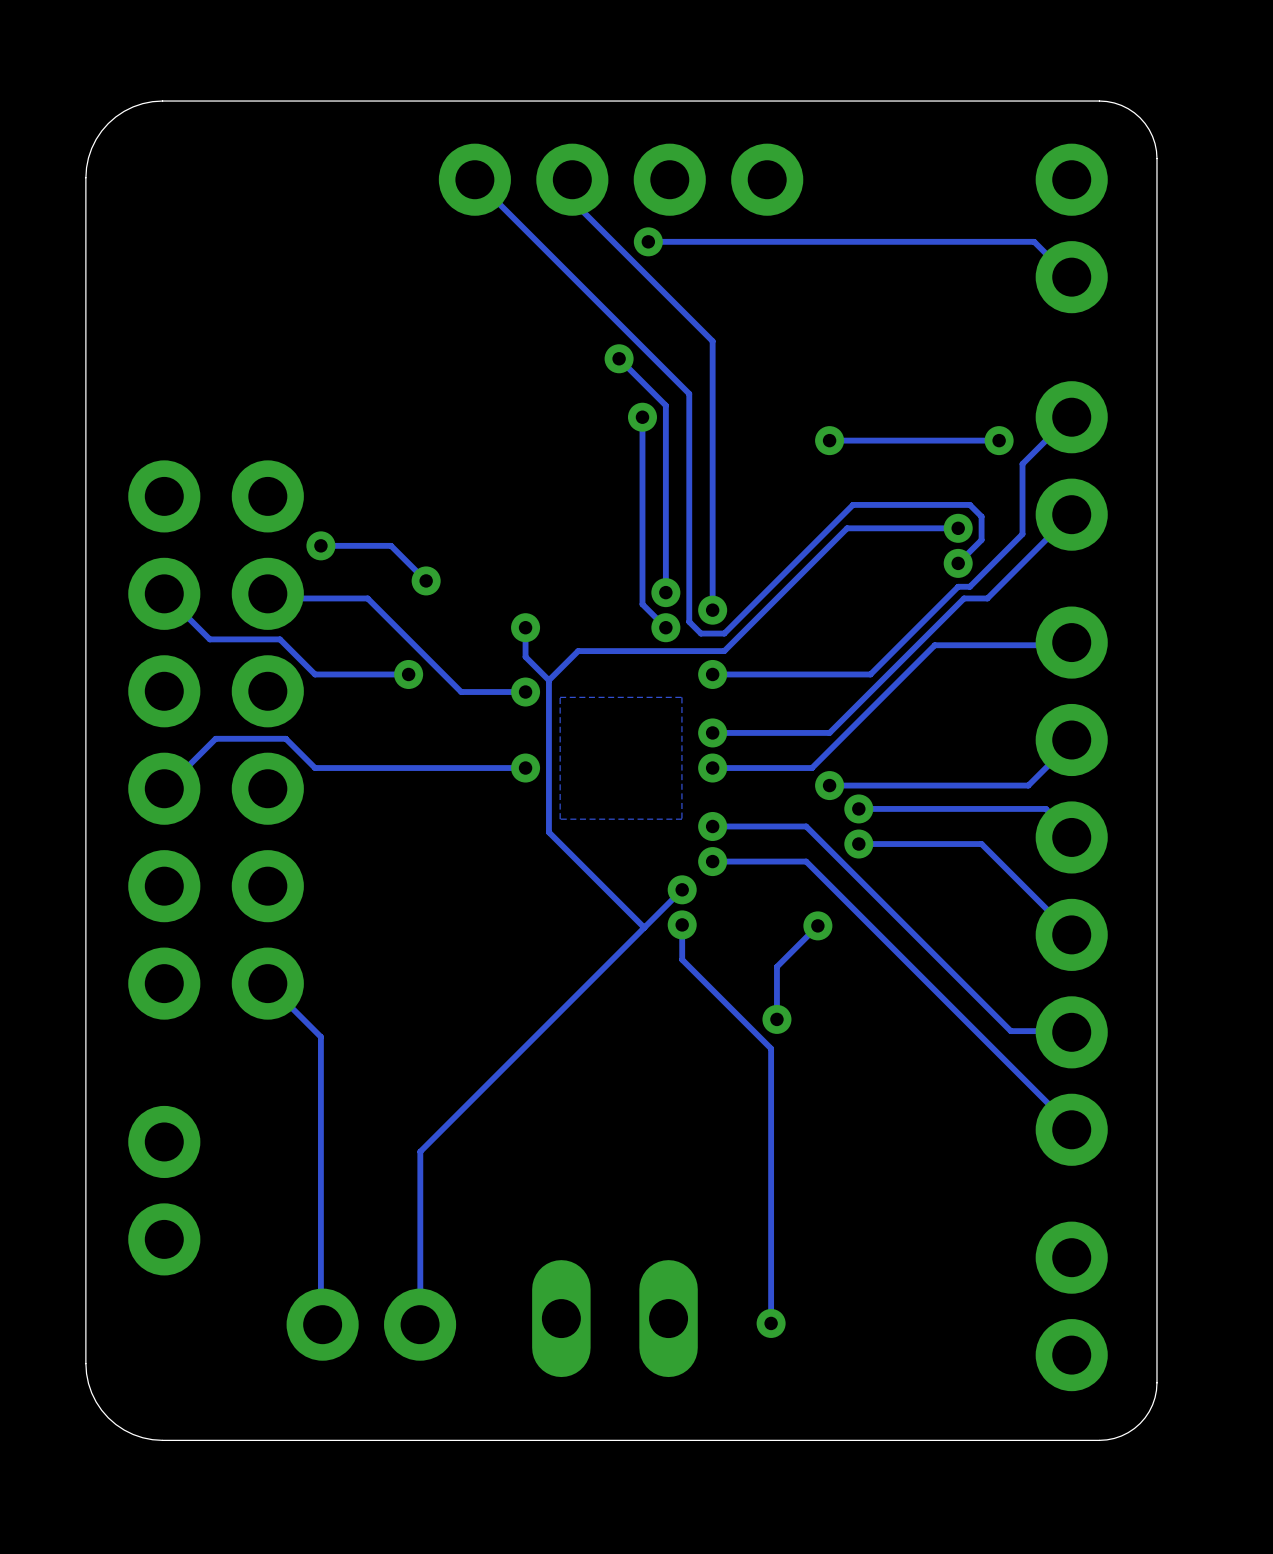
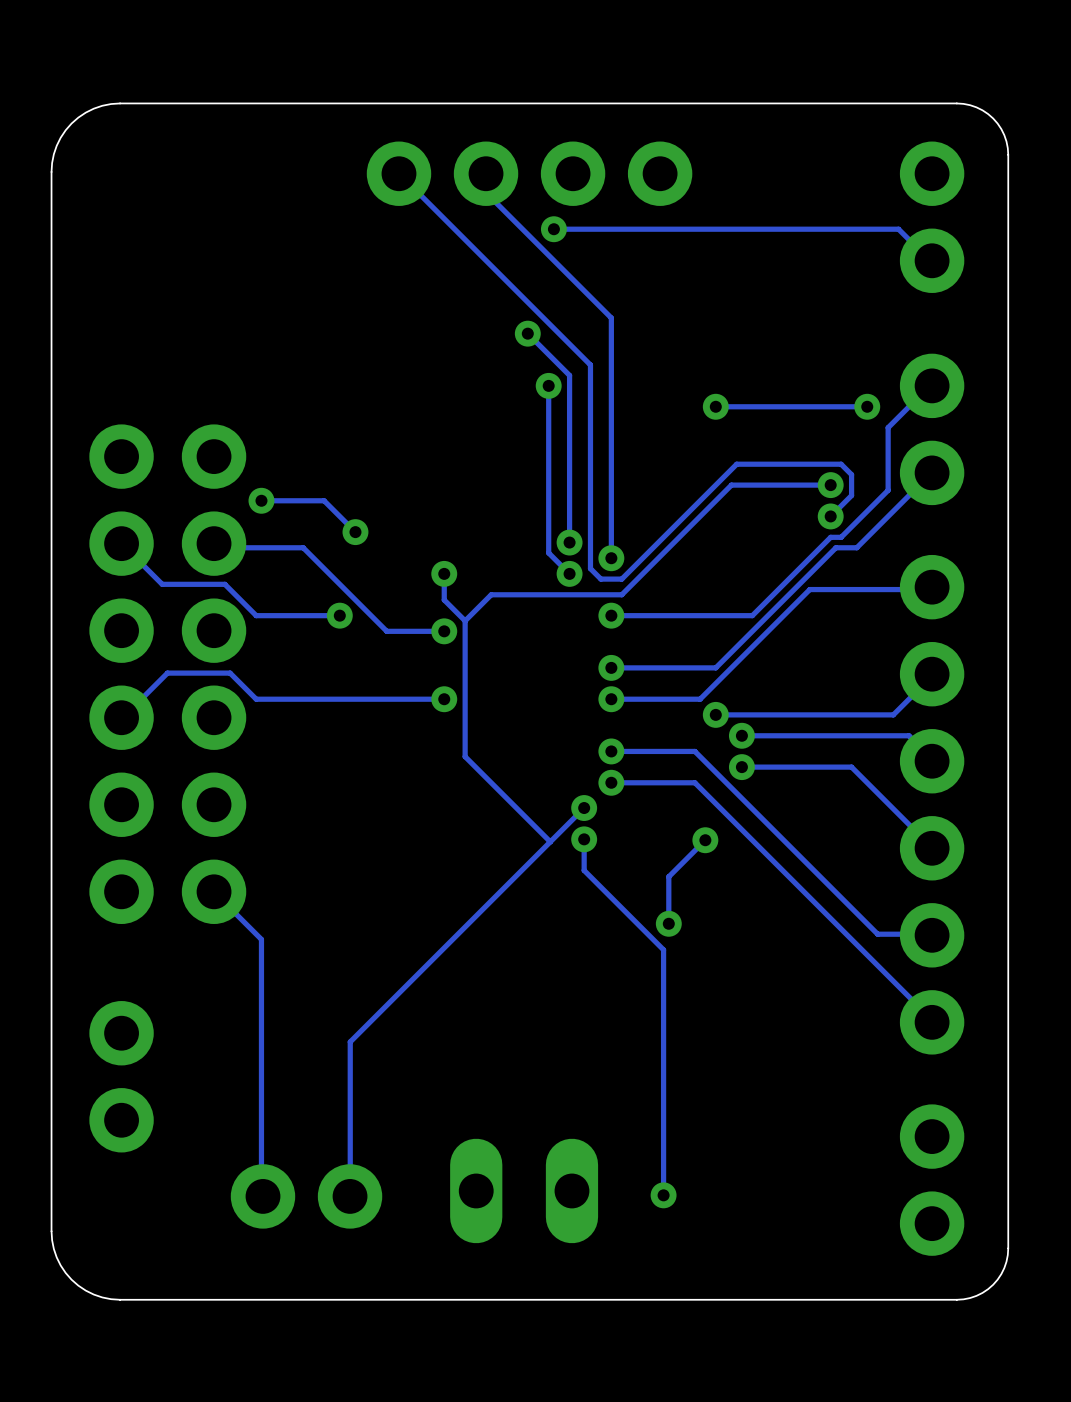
zone outline: (681, 697) (681, 819) (560, 819) (560, 697) (681, 697) -> none

